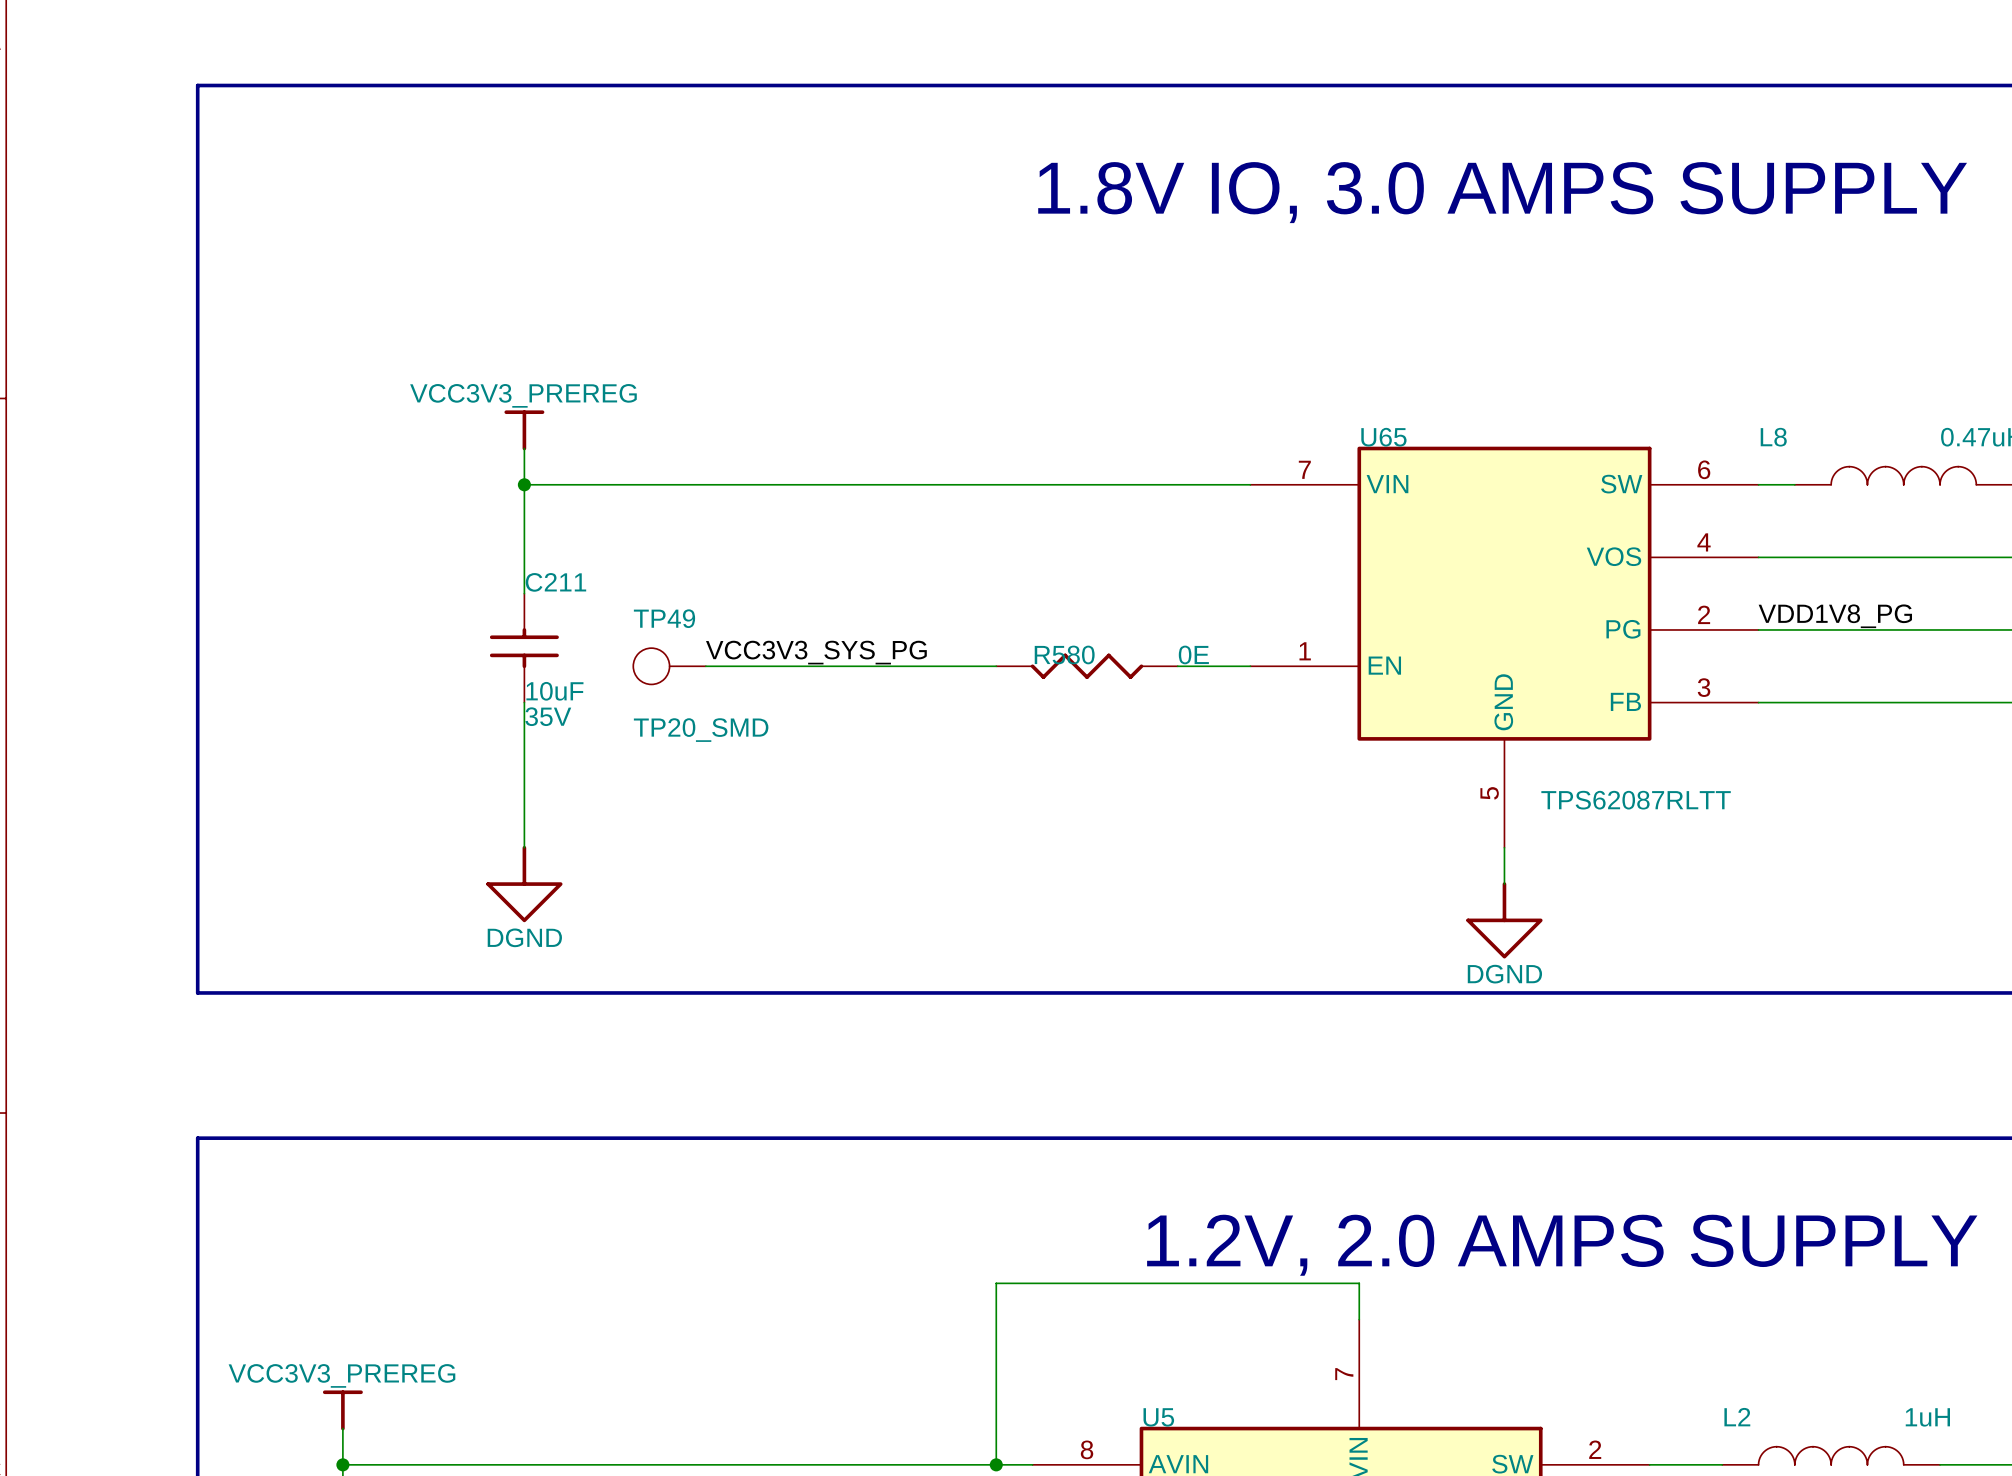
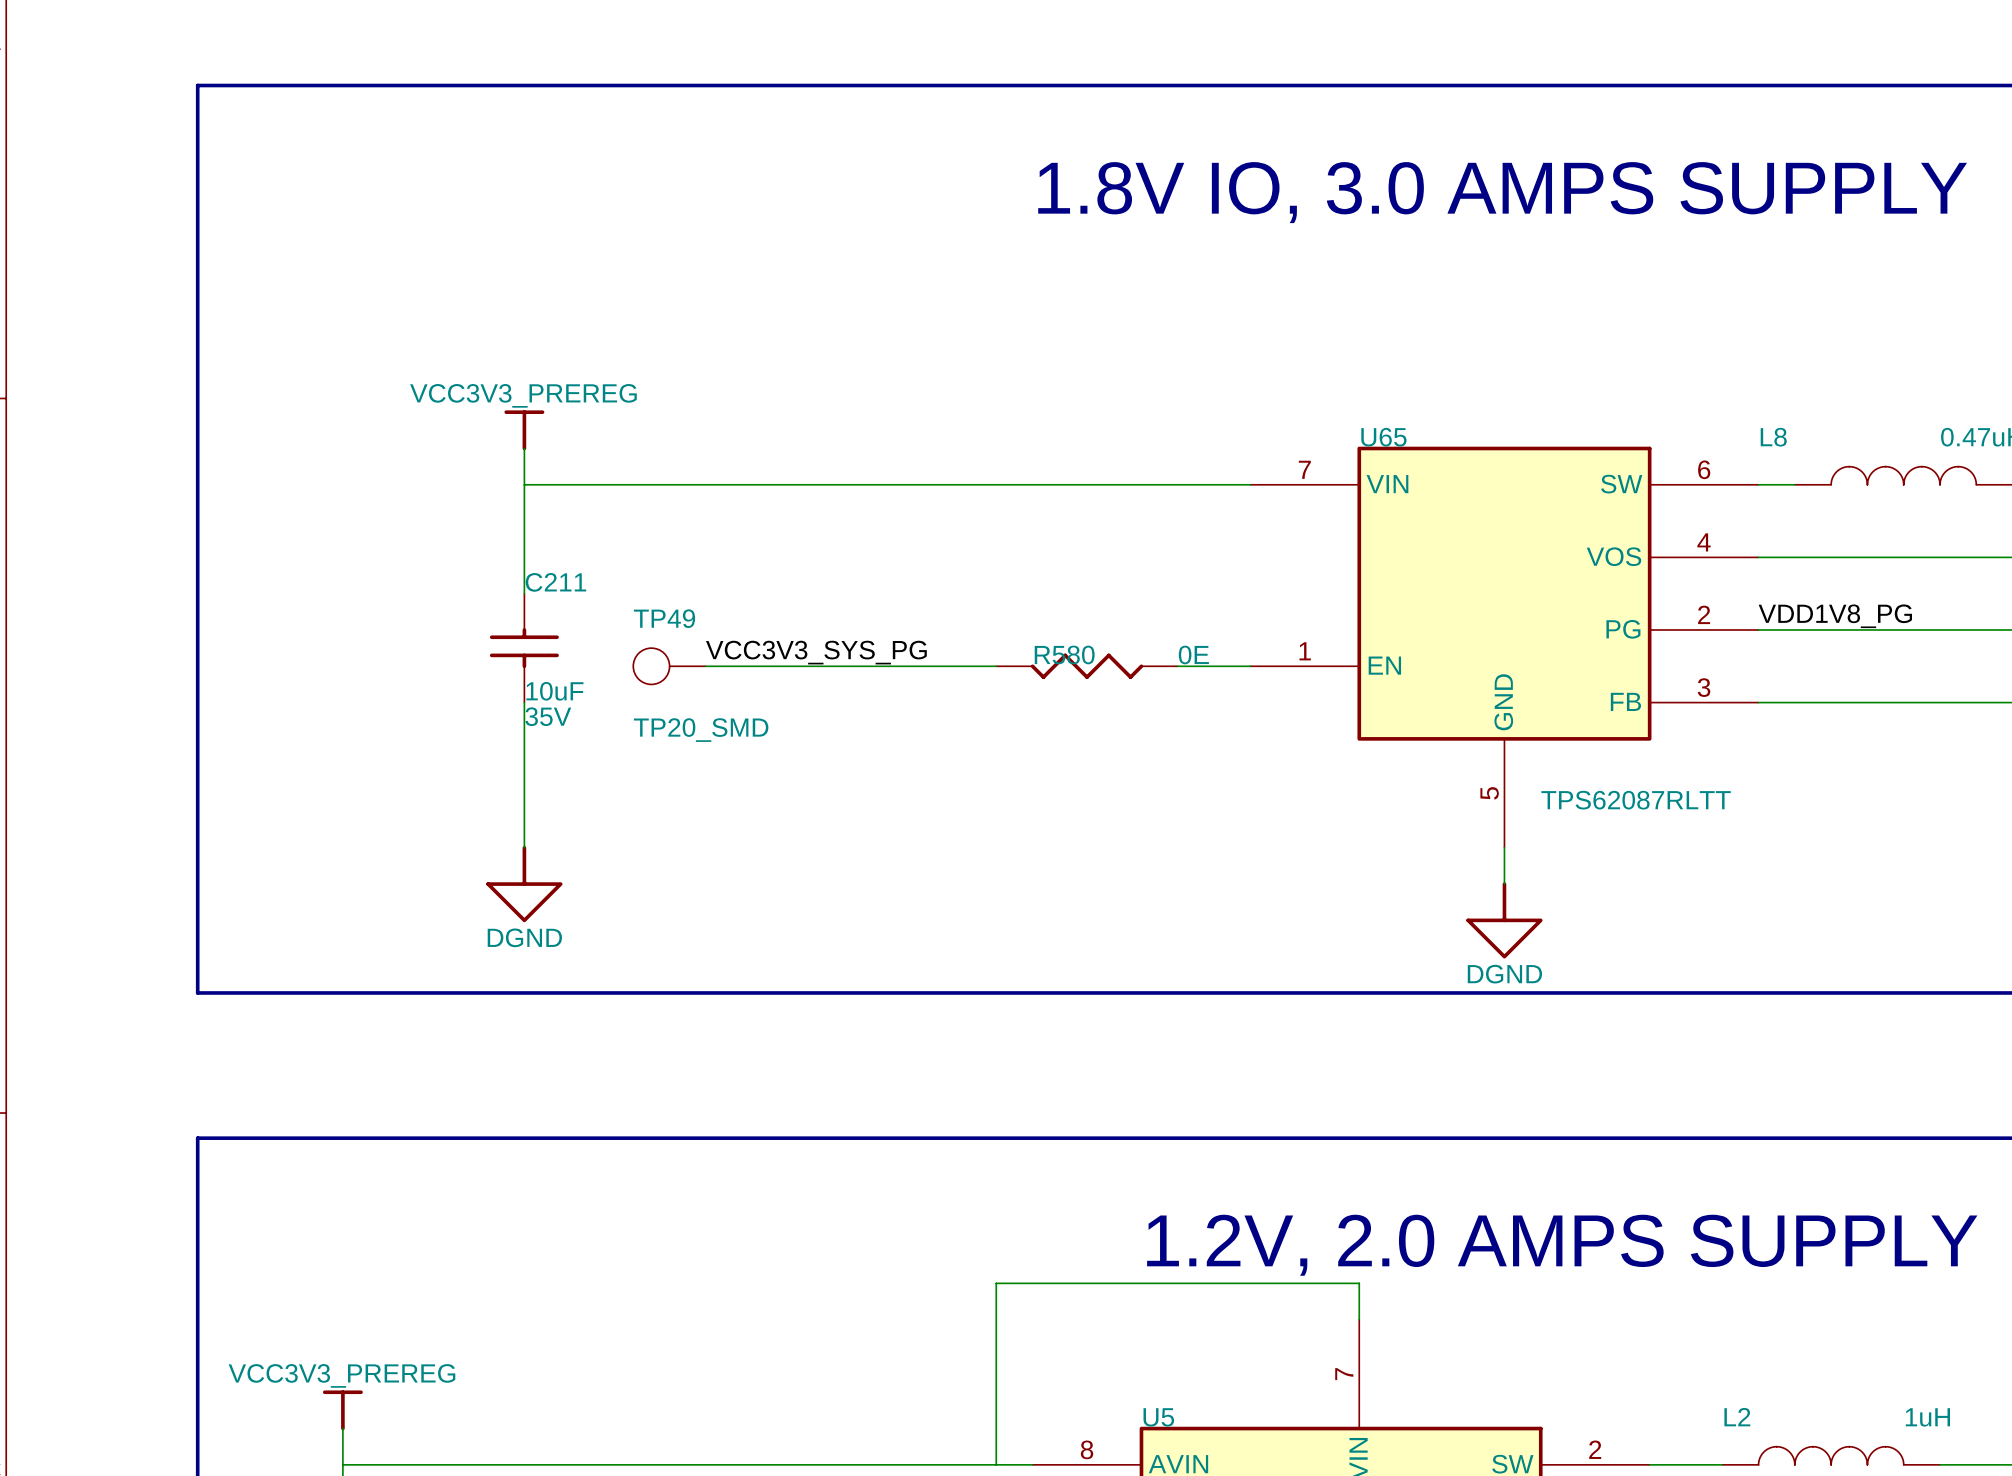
junction: (524, 484) -> none
junction: (342, 1464) -> none
junction: (996, 1464) -> none

